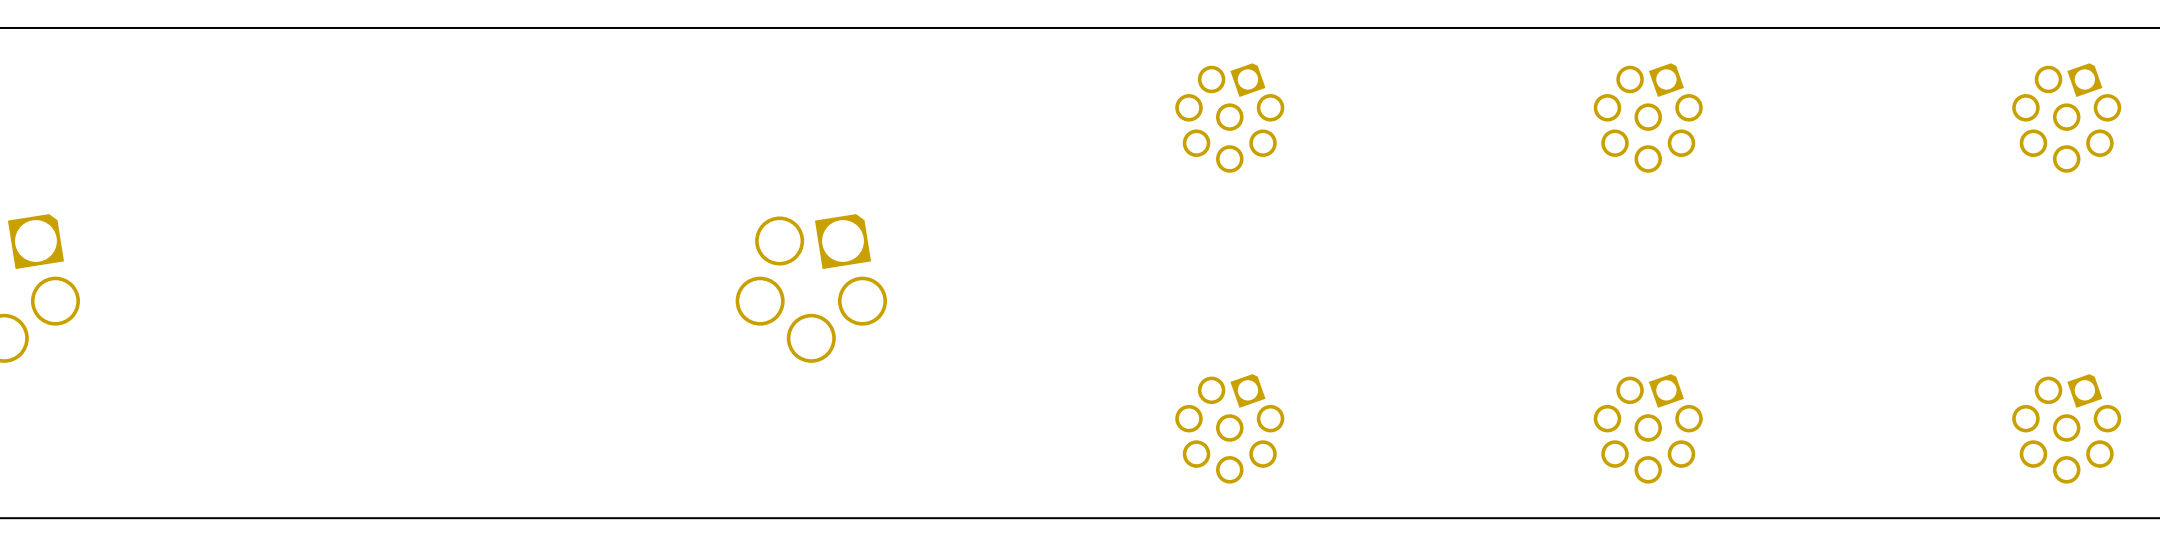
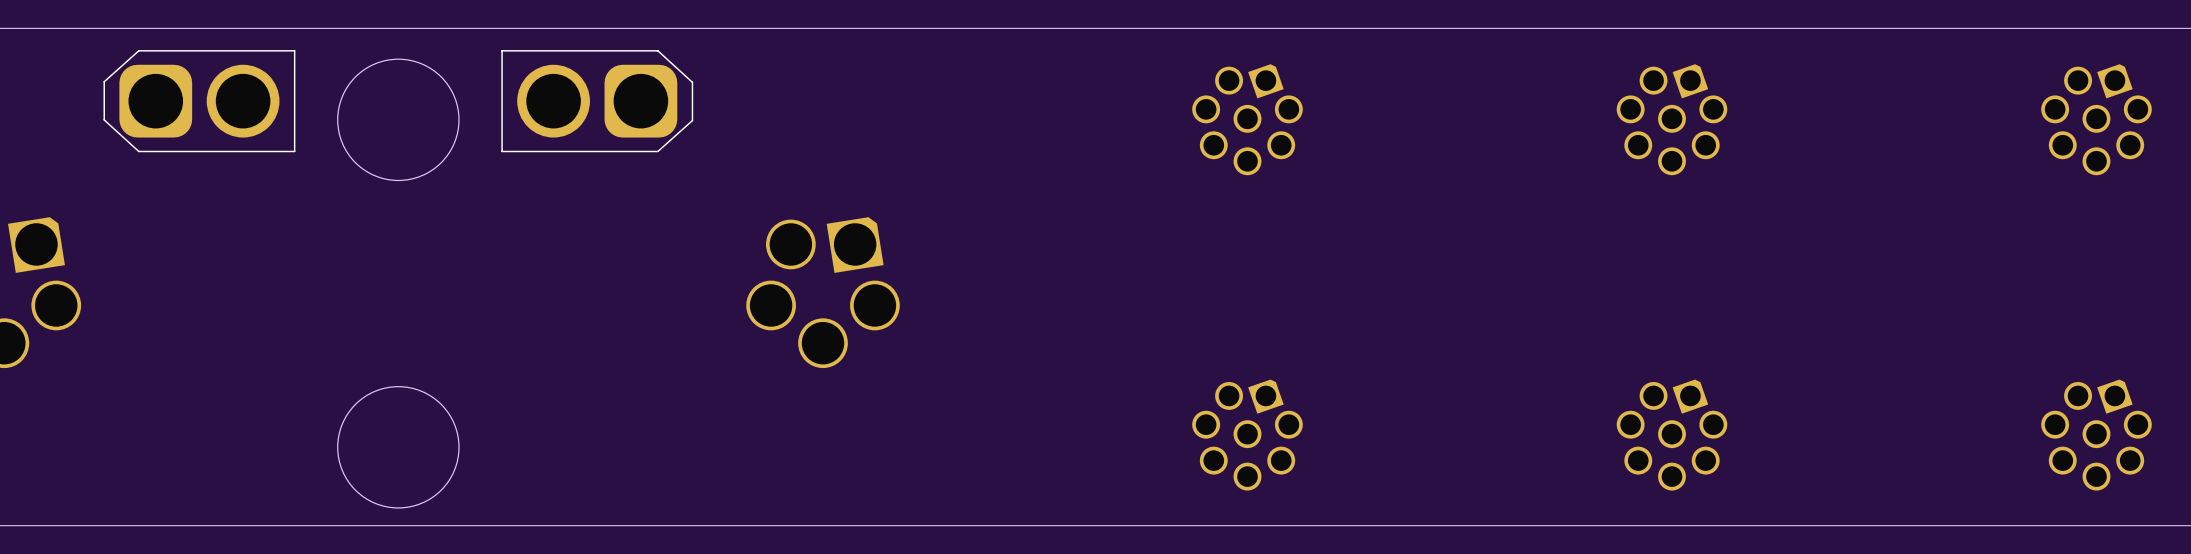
round board edge: none -> [337, 58, 460, 182]
part: none -> (199, 101)
part: none -> (597, 101)
round board edge: none -> [337, 386, 460, 509]

